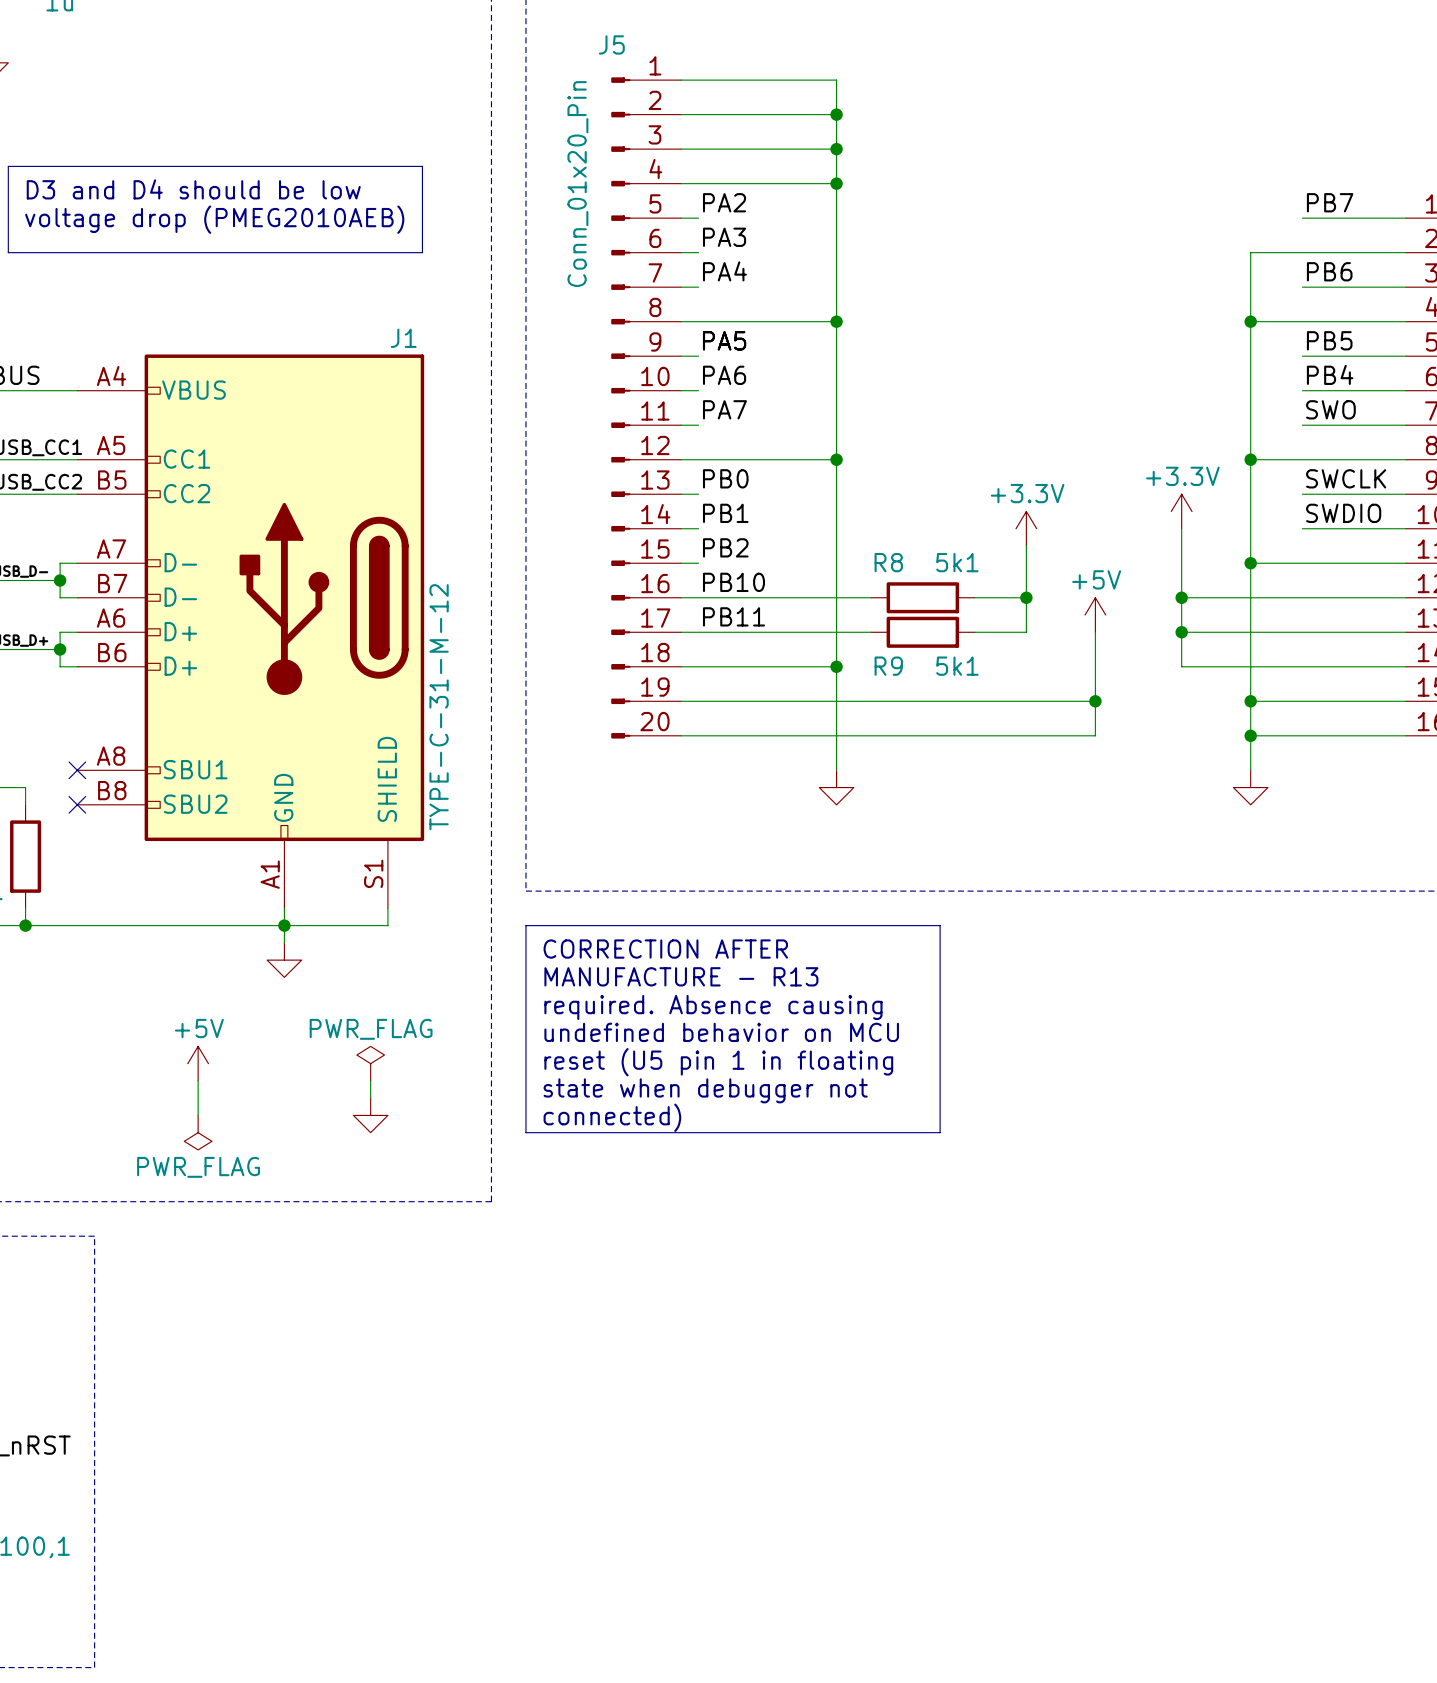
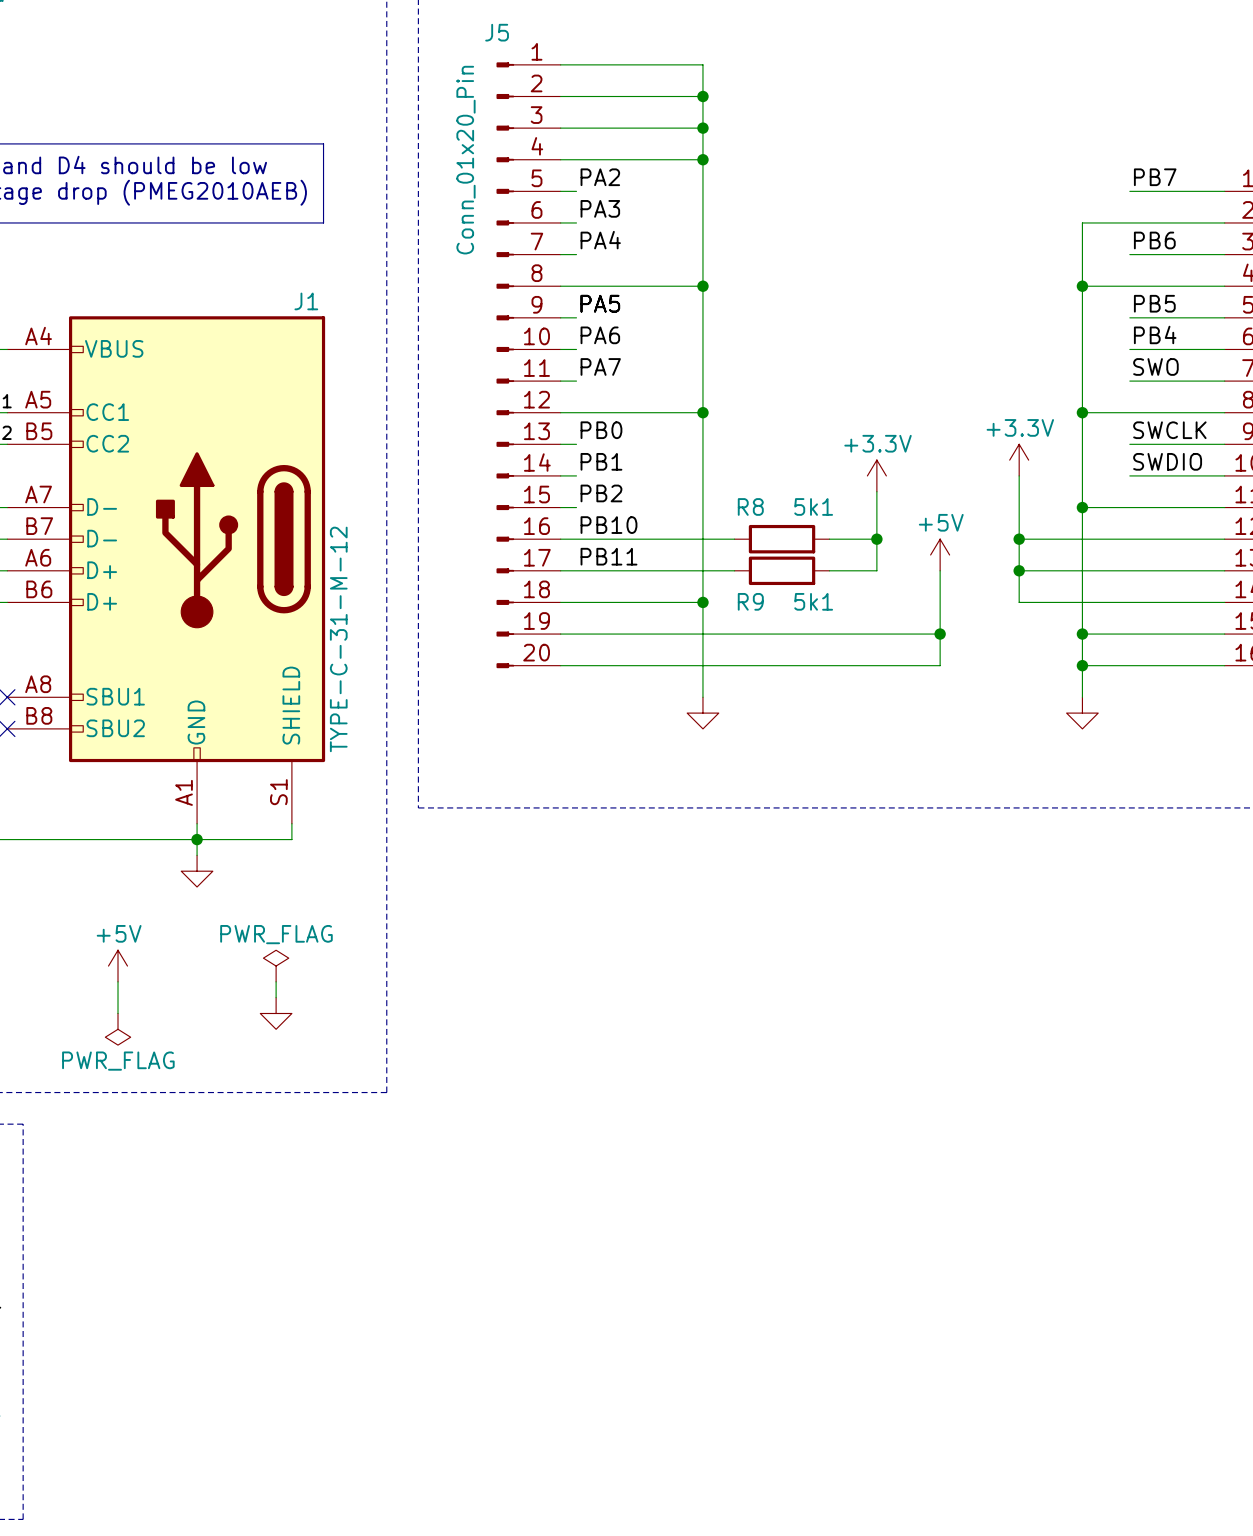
line: (525, 925) (940, 925) (940, 1132) (525, 1132) (525, 925) -> none
text: CORRECTION AFTER (665, 949) -> none
text: MANUFACTURE - R13 (681, 976) -> none
text: required. Absence causing (713, 1007) -> none
text: undefined behavior on MCU (721, 1032) -> none
text: reset (U5 pin 1 in floating (718, 1062) -> none
text: state when debugger not (705, 1090) -> none
text: connected) (612, 1117) -> none

